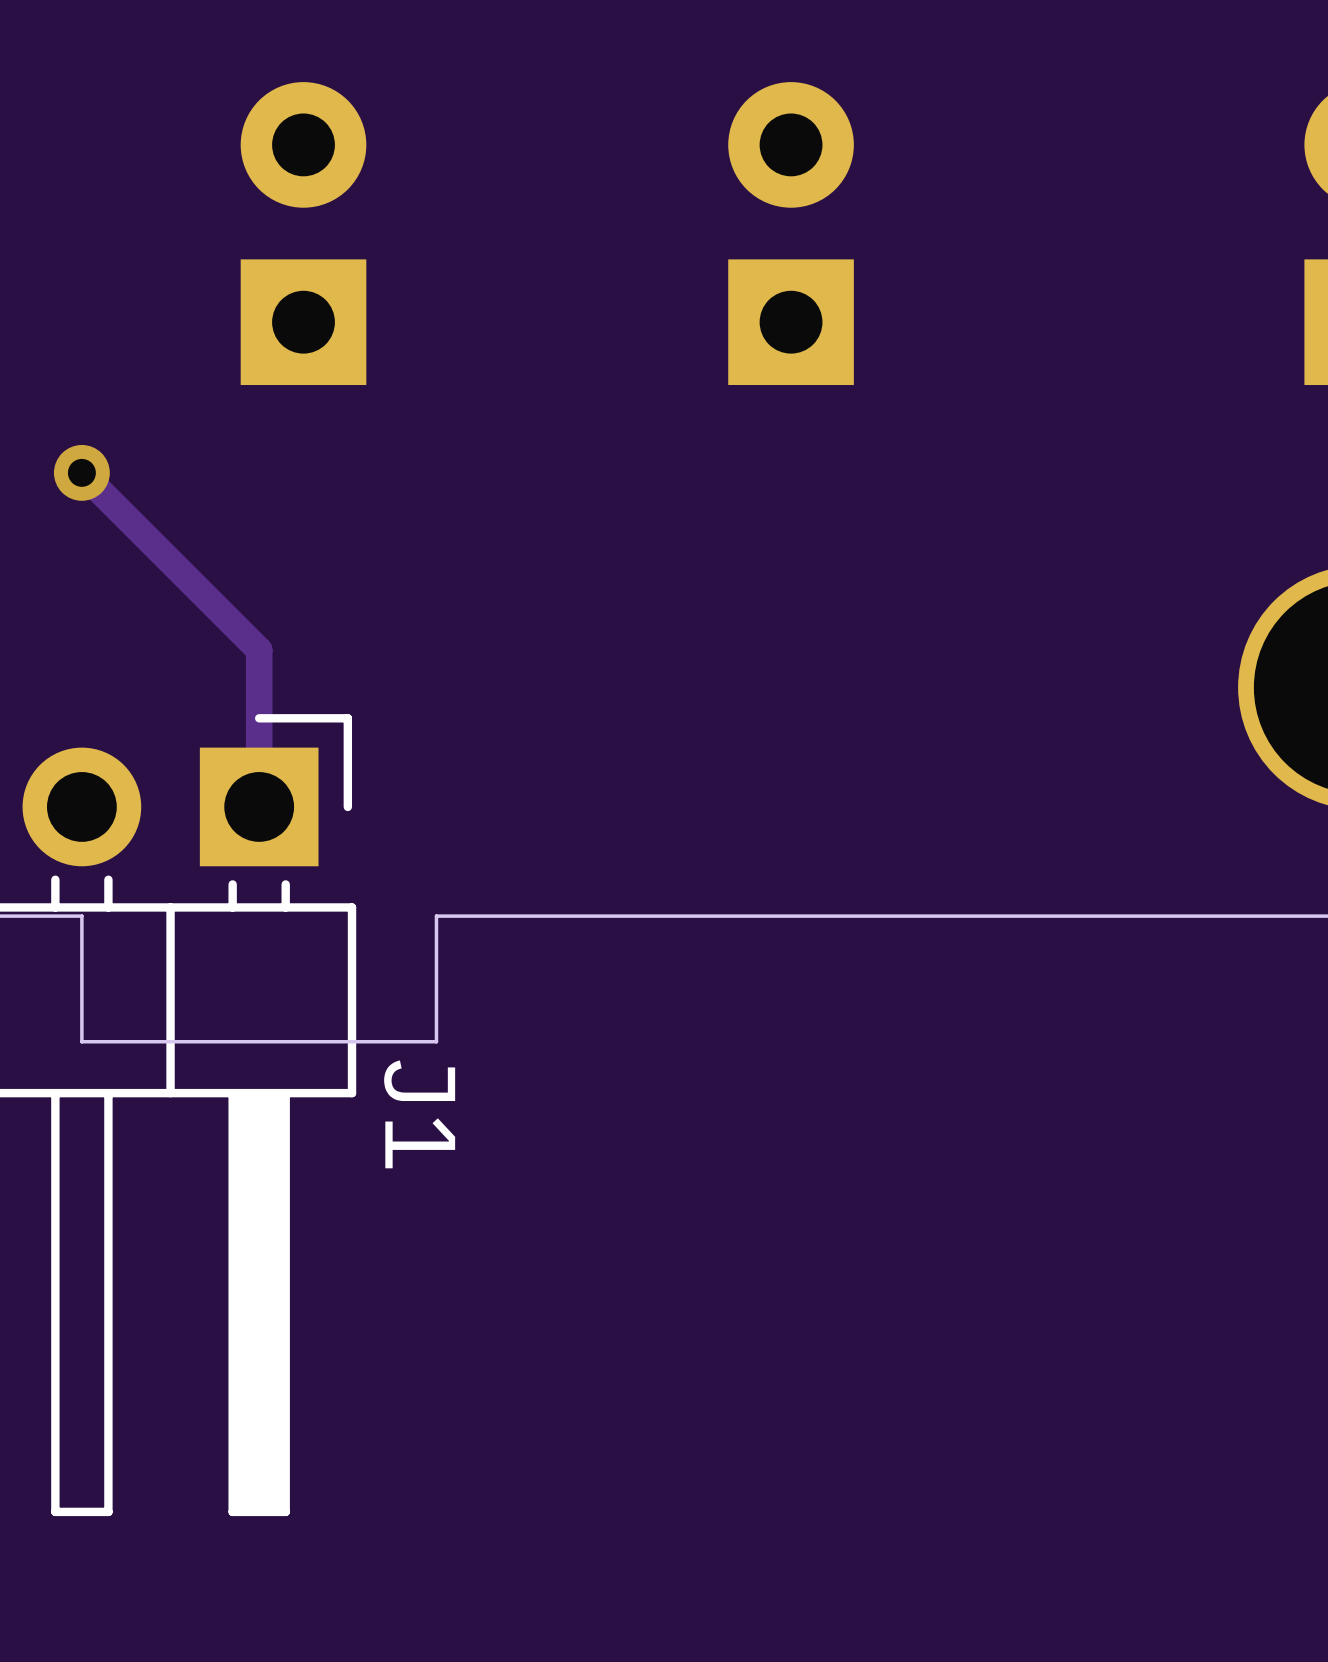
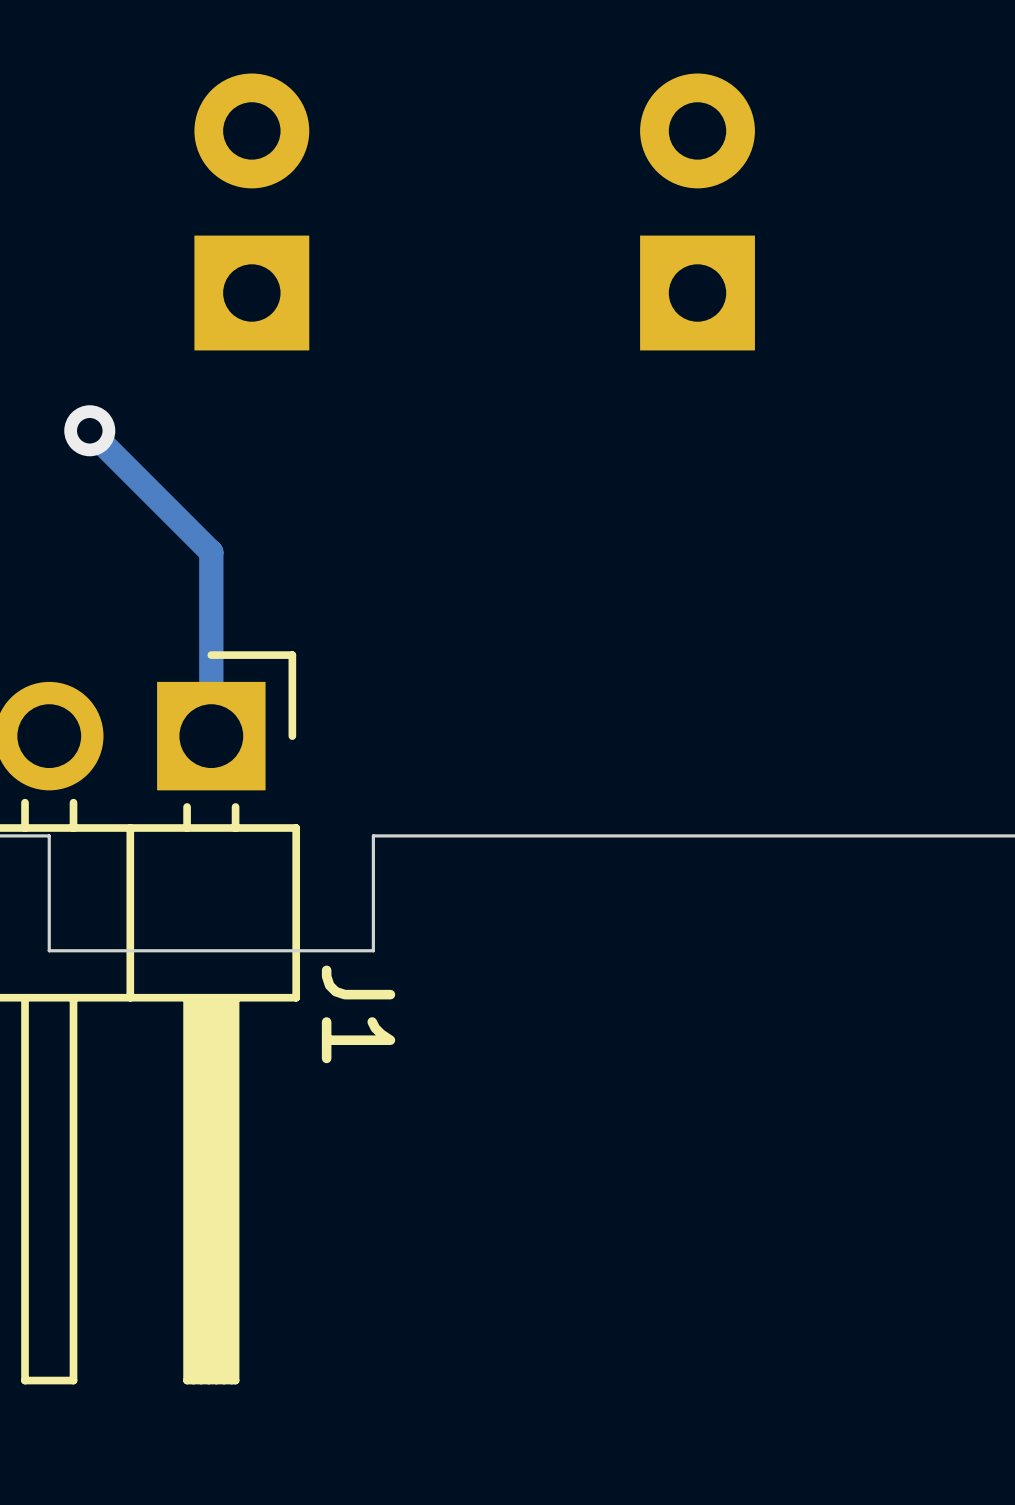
track: (81, 472) (259, 650) -> (89, 430) (211, 552) (211, 592)
via position: (81, 472) -> (89, 430)

